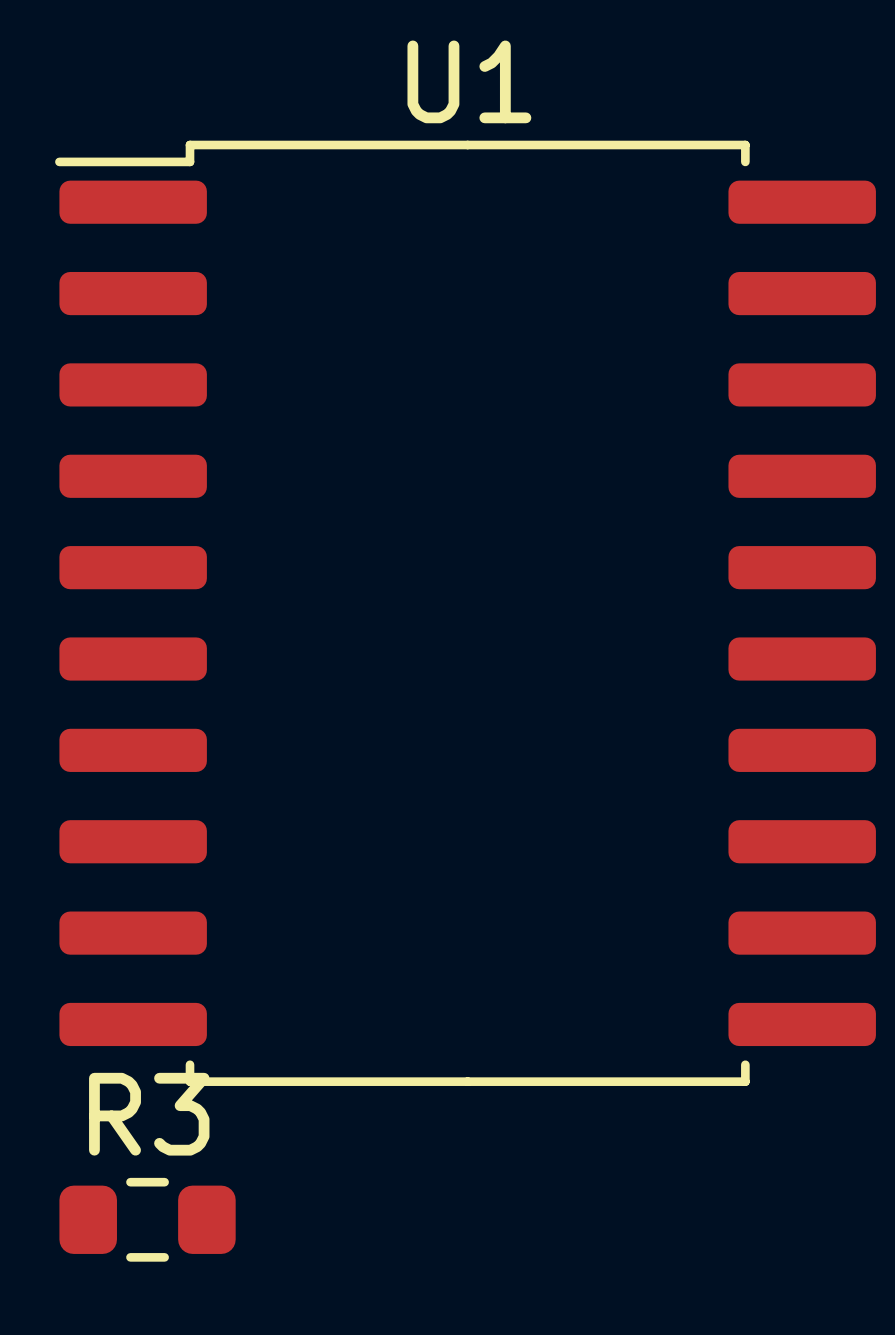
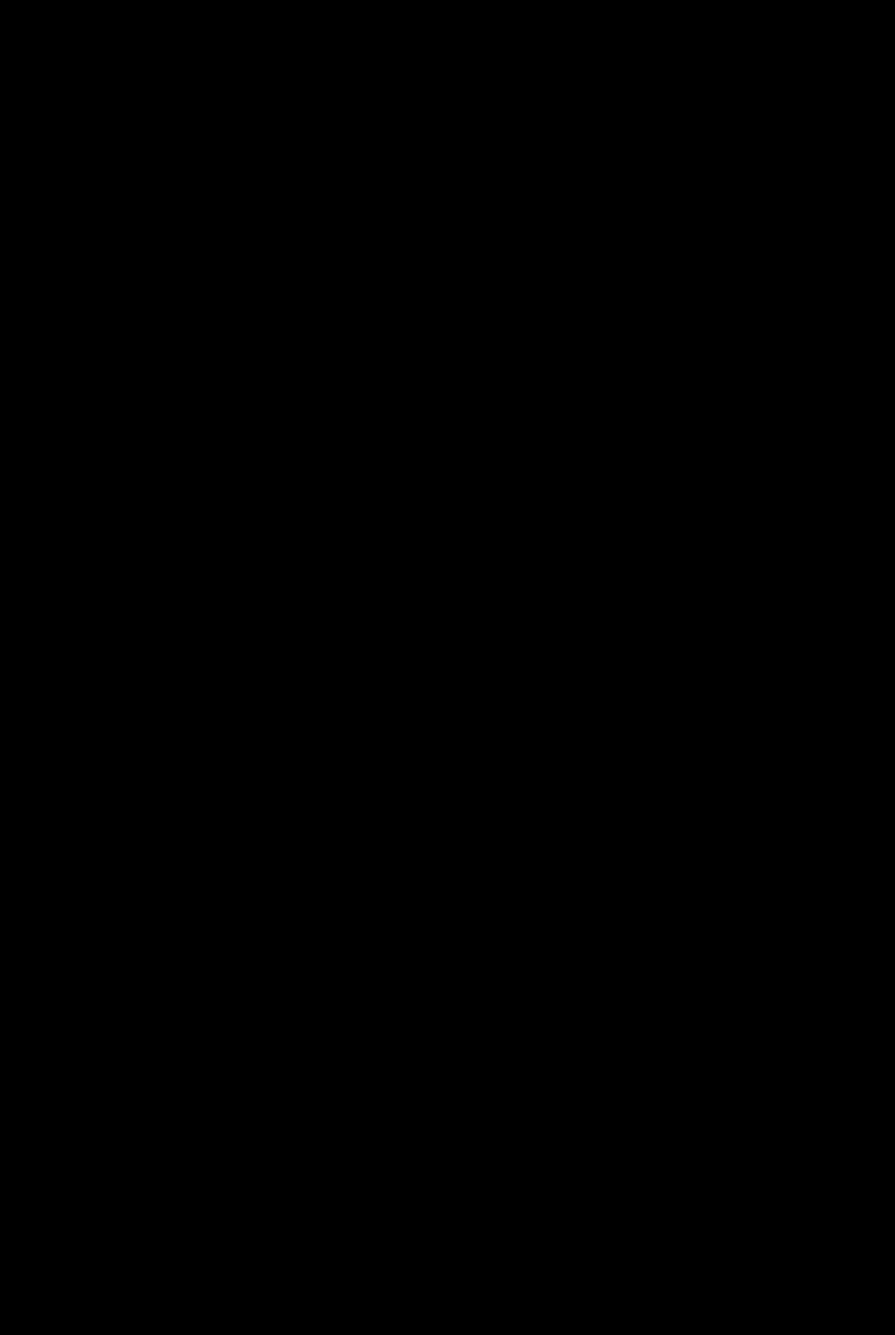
U1: (465, 613) -> none
R3: (147, 1219) -> none

